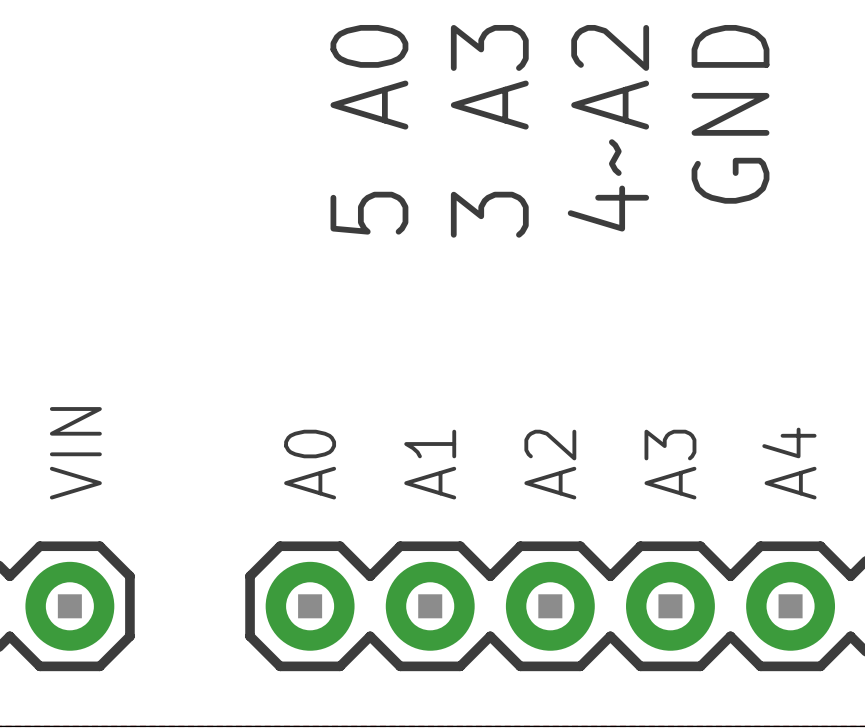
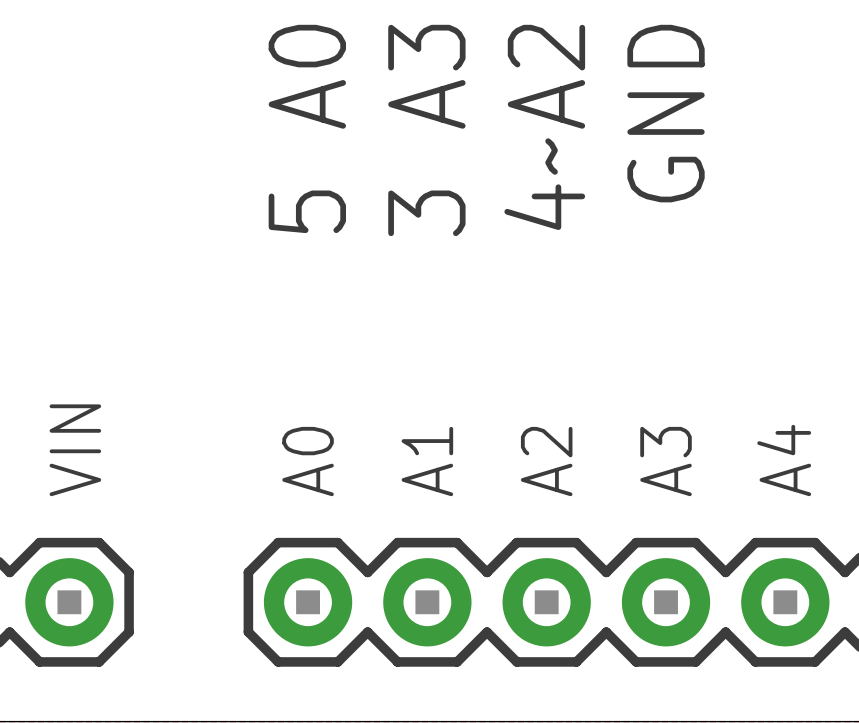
text position: GND (730, 114) -> GND (666, 113)
text position: 4~A2 (608, 128) -> 4~A2 (544, 127)
text position: 5 A0 (369, 129) -> 5 A0 (307, 128)
text position: 3 A3 (489, 131) -> 3 A3 (426, 130)

